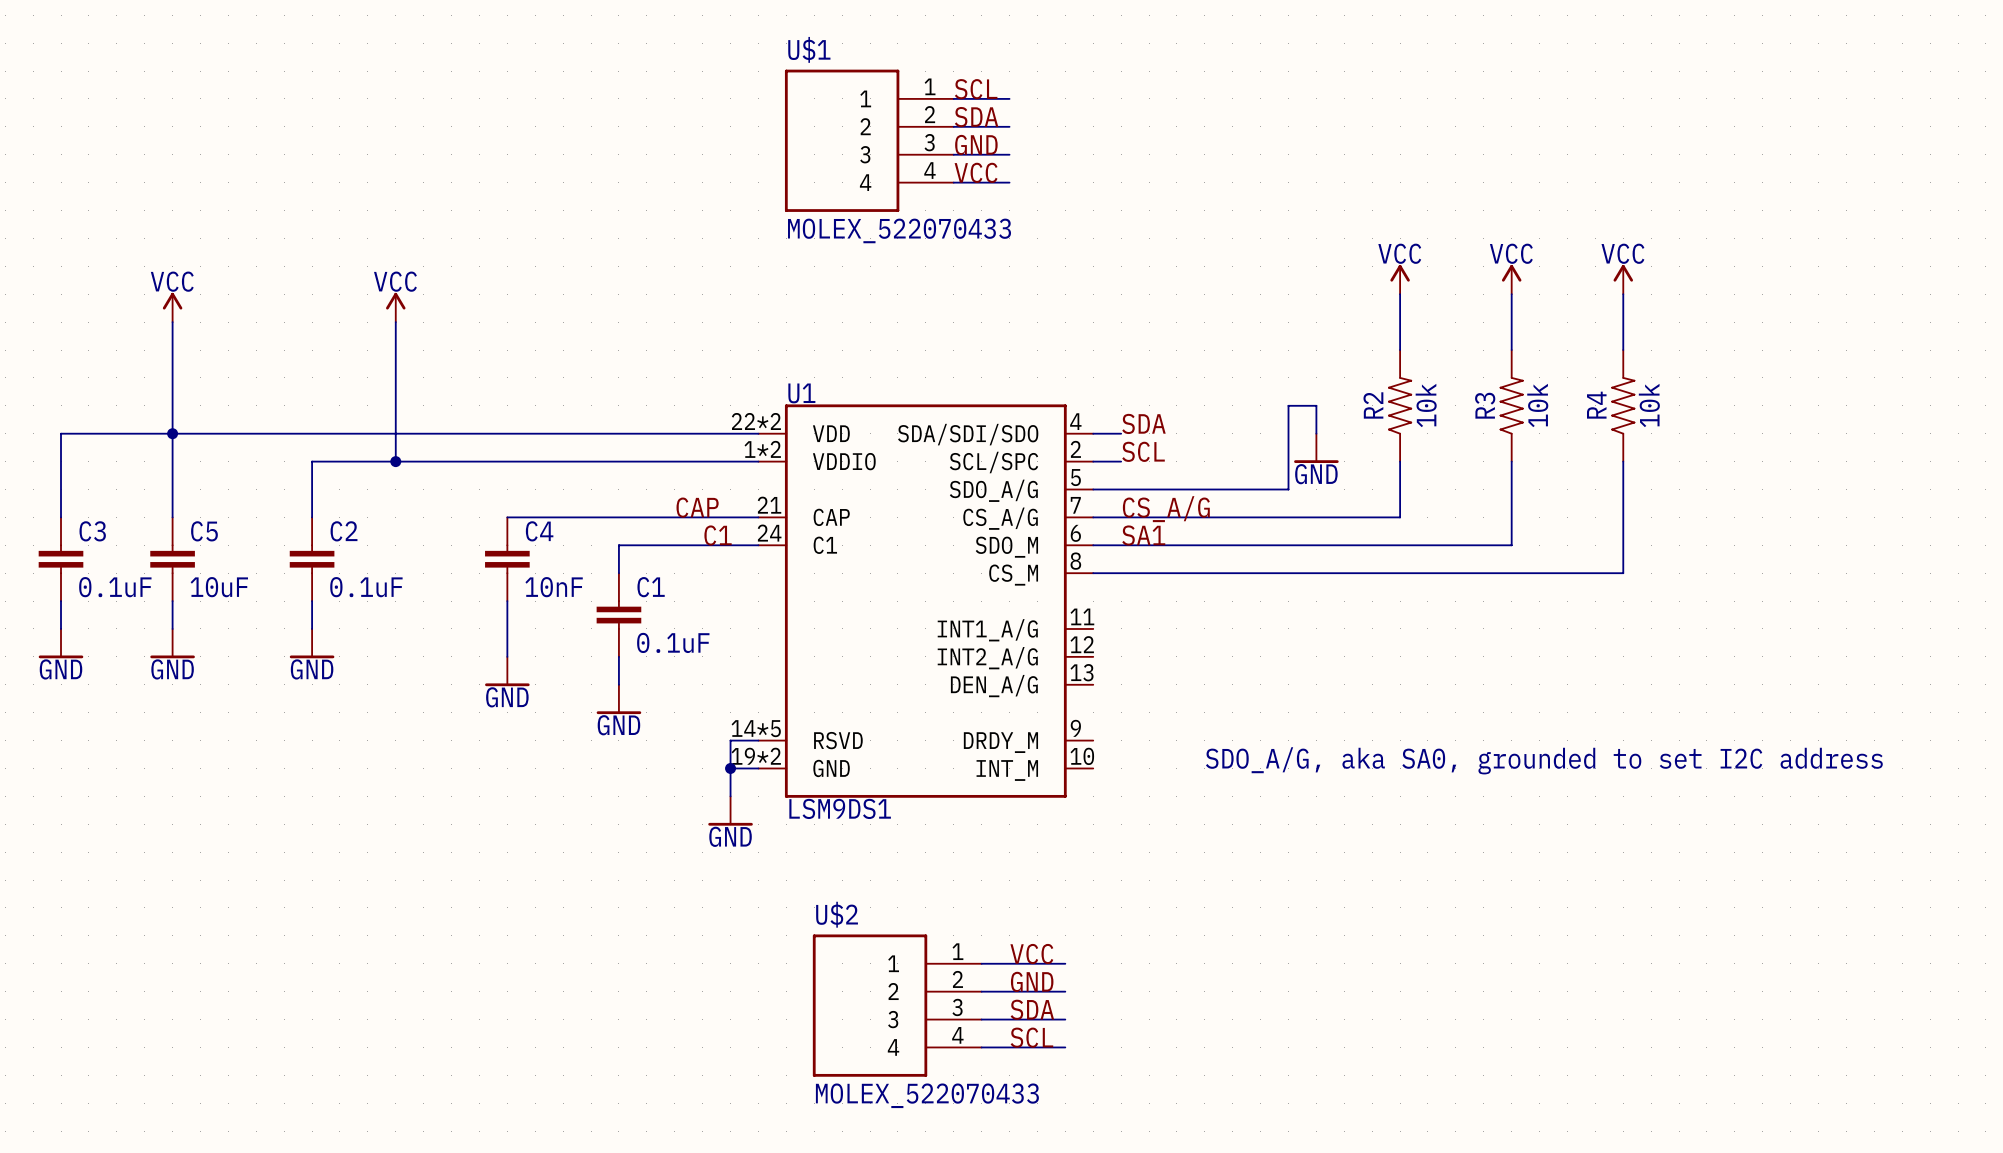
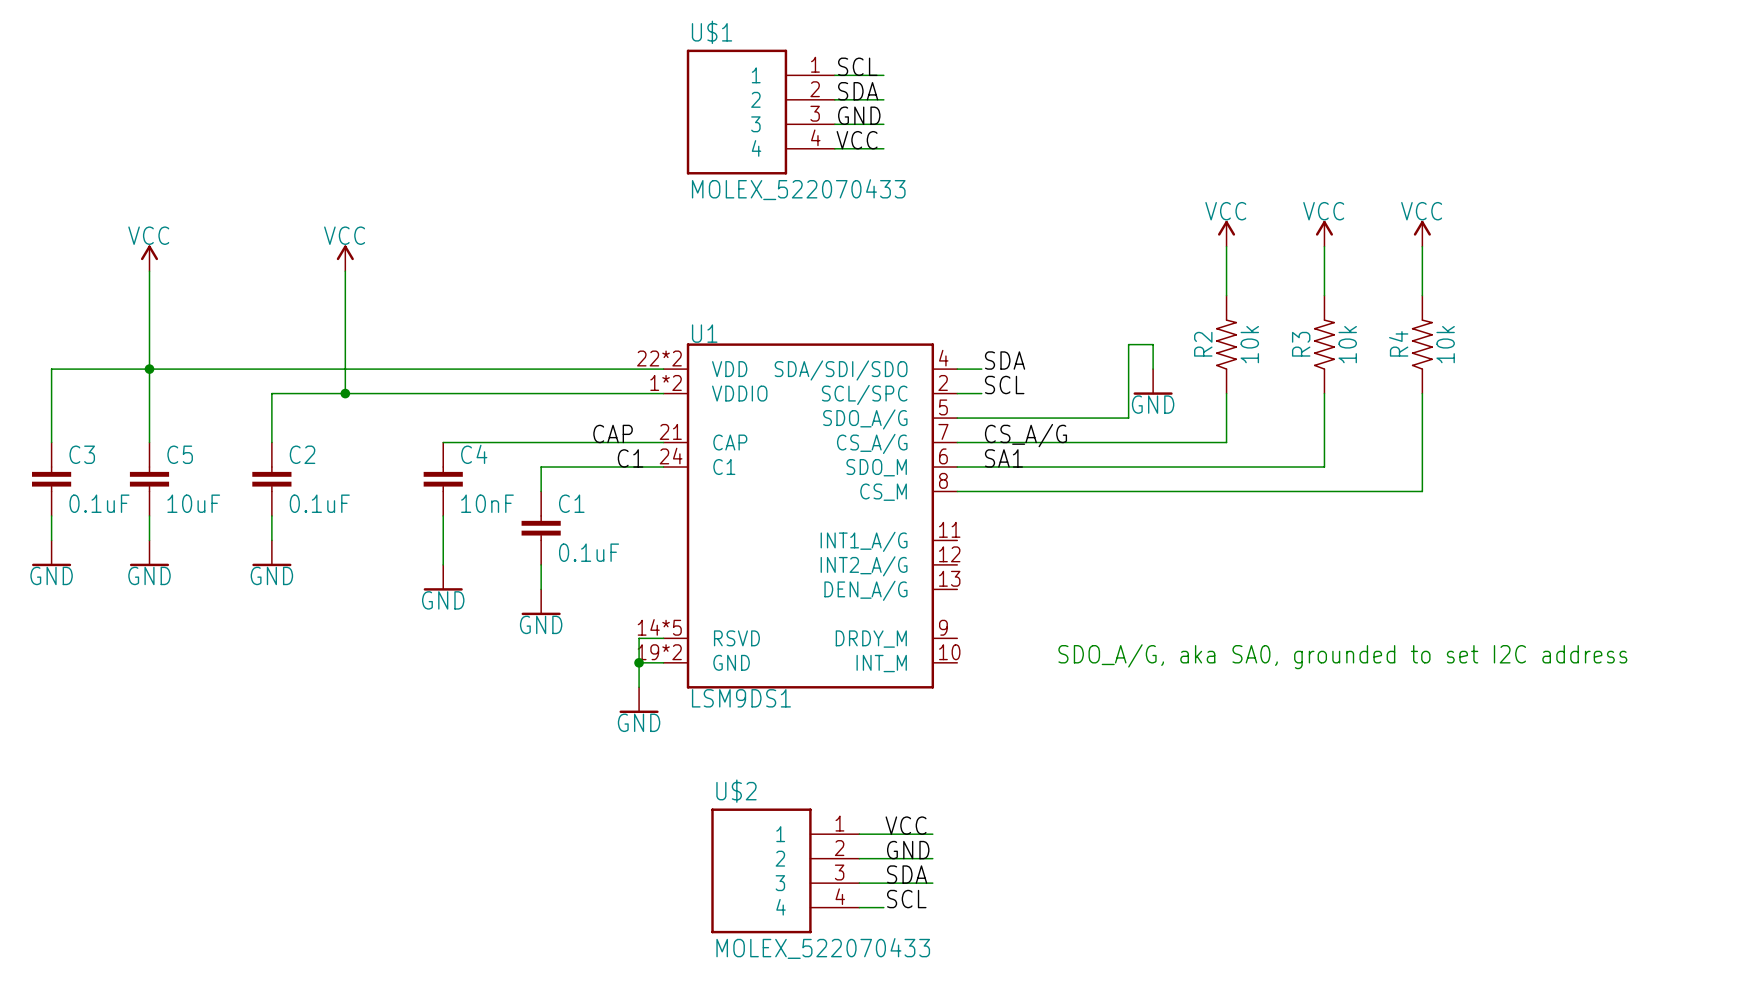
wire: (1009, 1047) (1065, 1047) -> none

